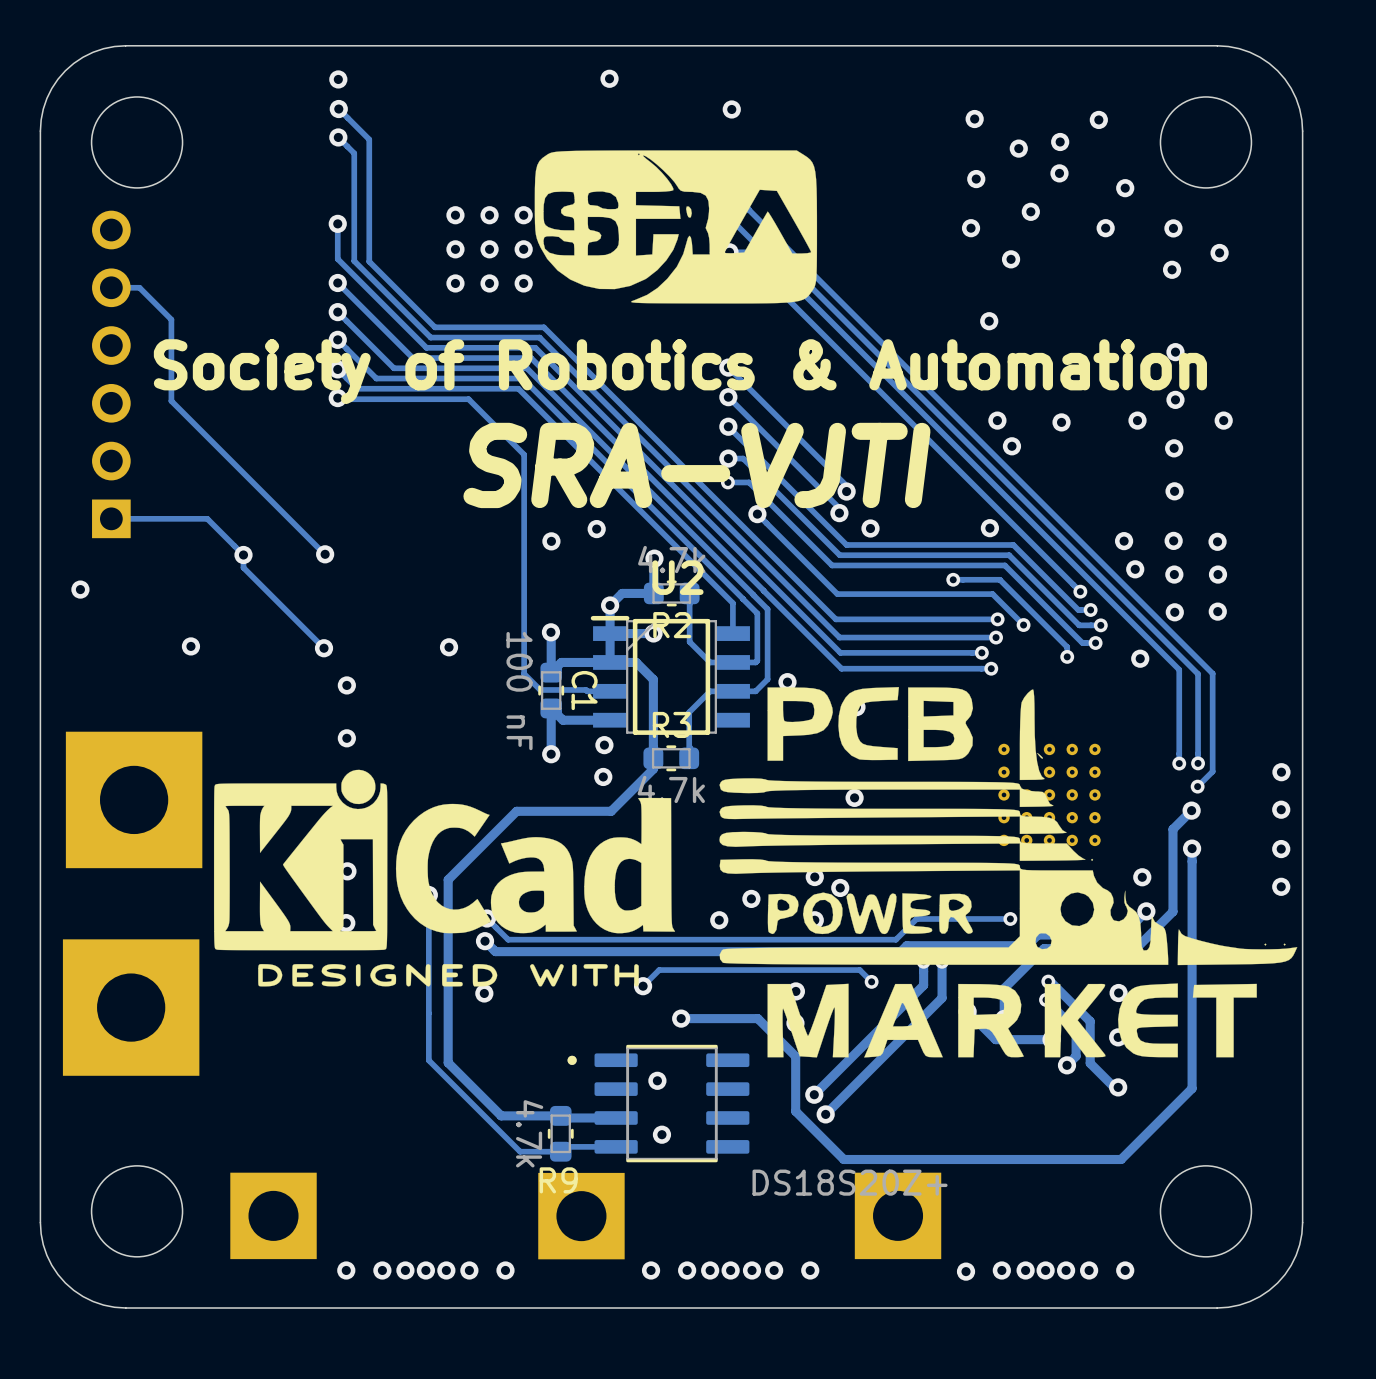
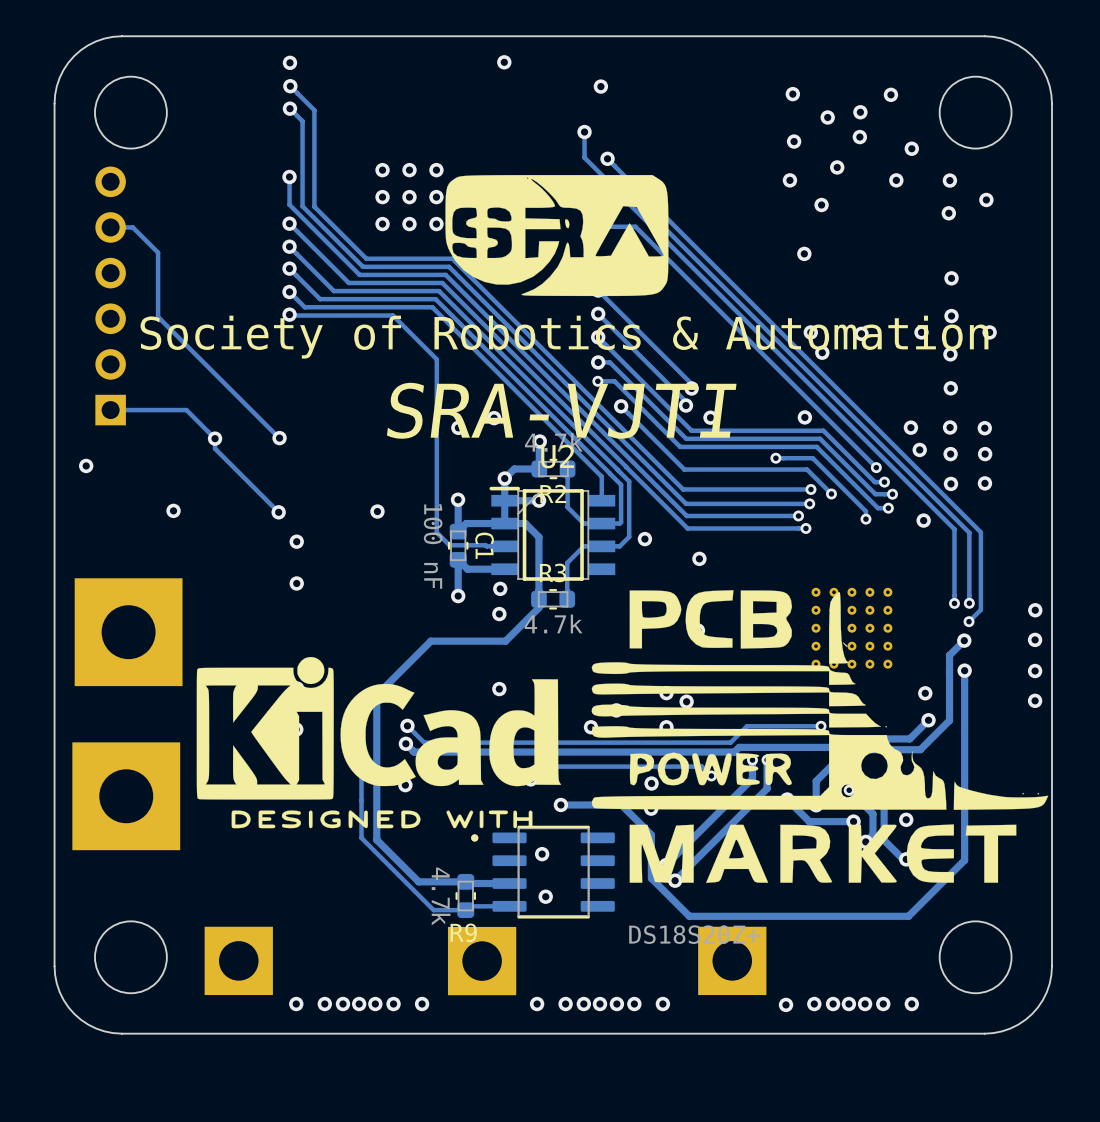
drawing position: (675, 226) -> (556, 235)
text position: Society of Robotics & Automation (680, 371) -> Society of Robotics & Automation (564, 337)
text position: SRA-VJTI (696, 465) -> SRA-VJTI (561, 410)
drawing position: (1008, 872) -> (819, 736)
drawing position: (444, 878) -> (378, 742)

